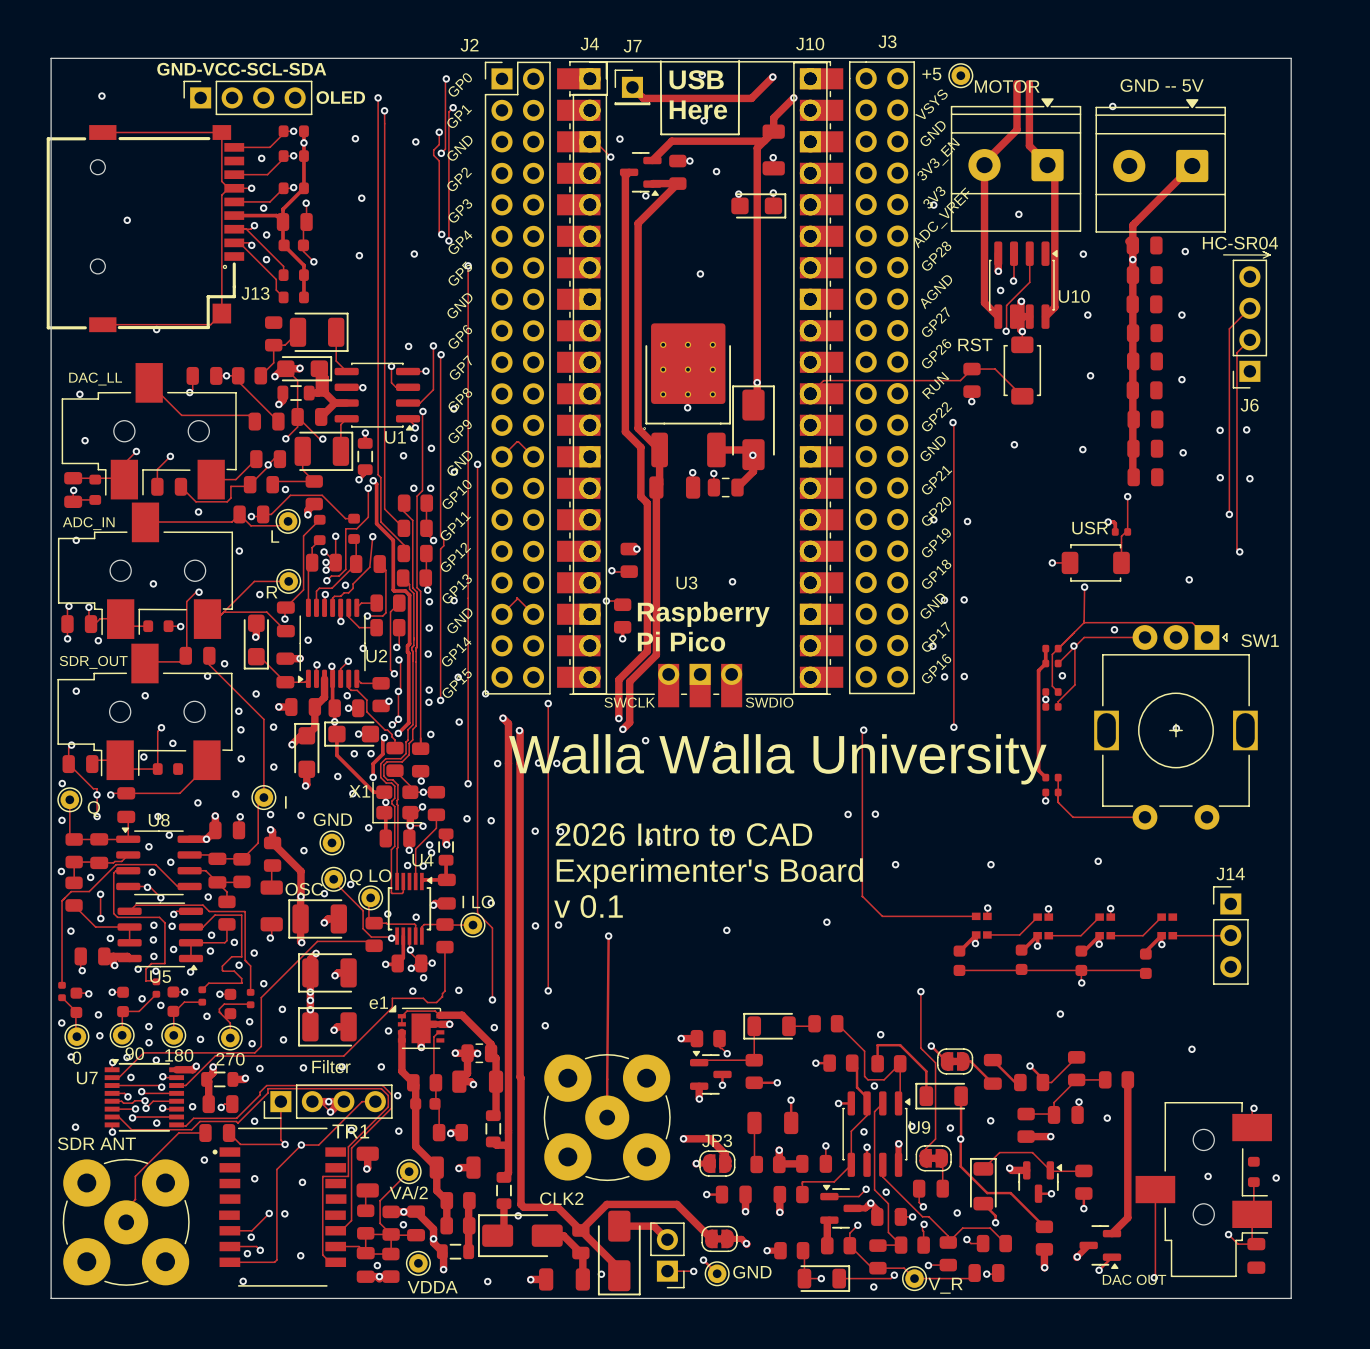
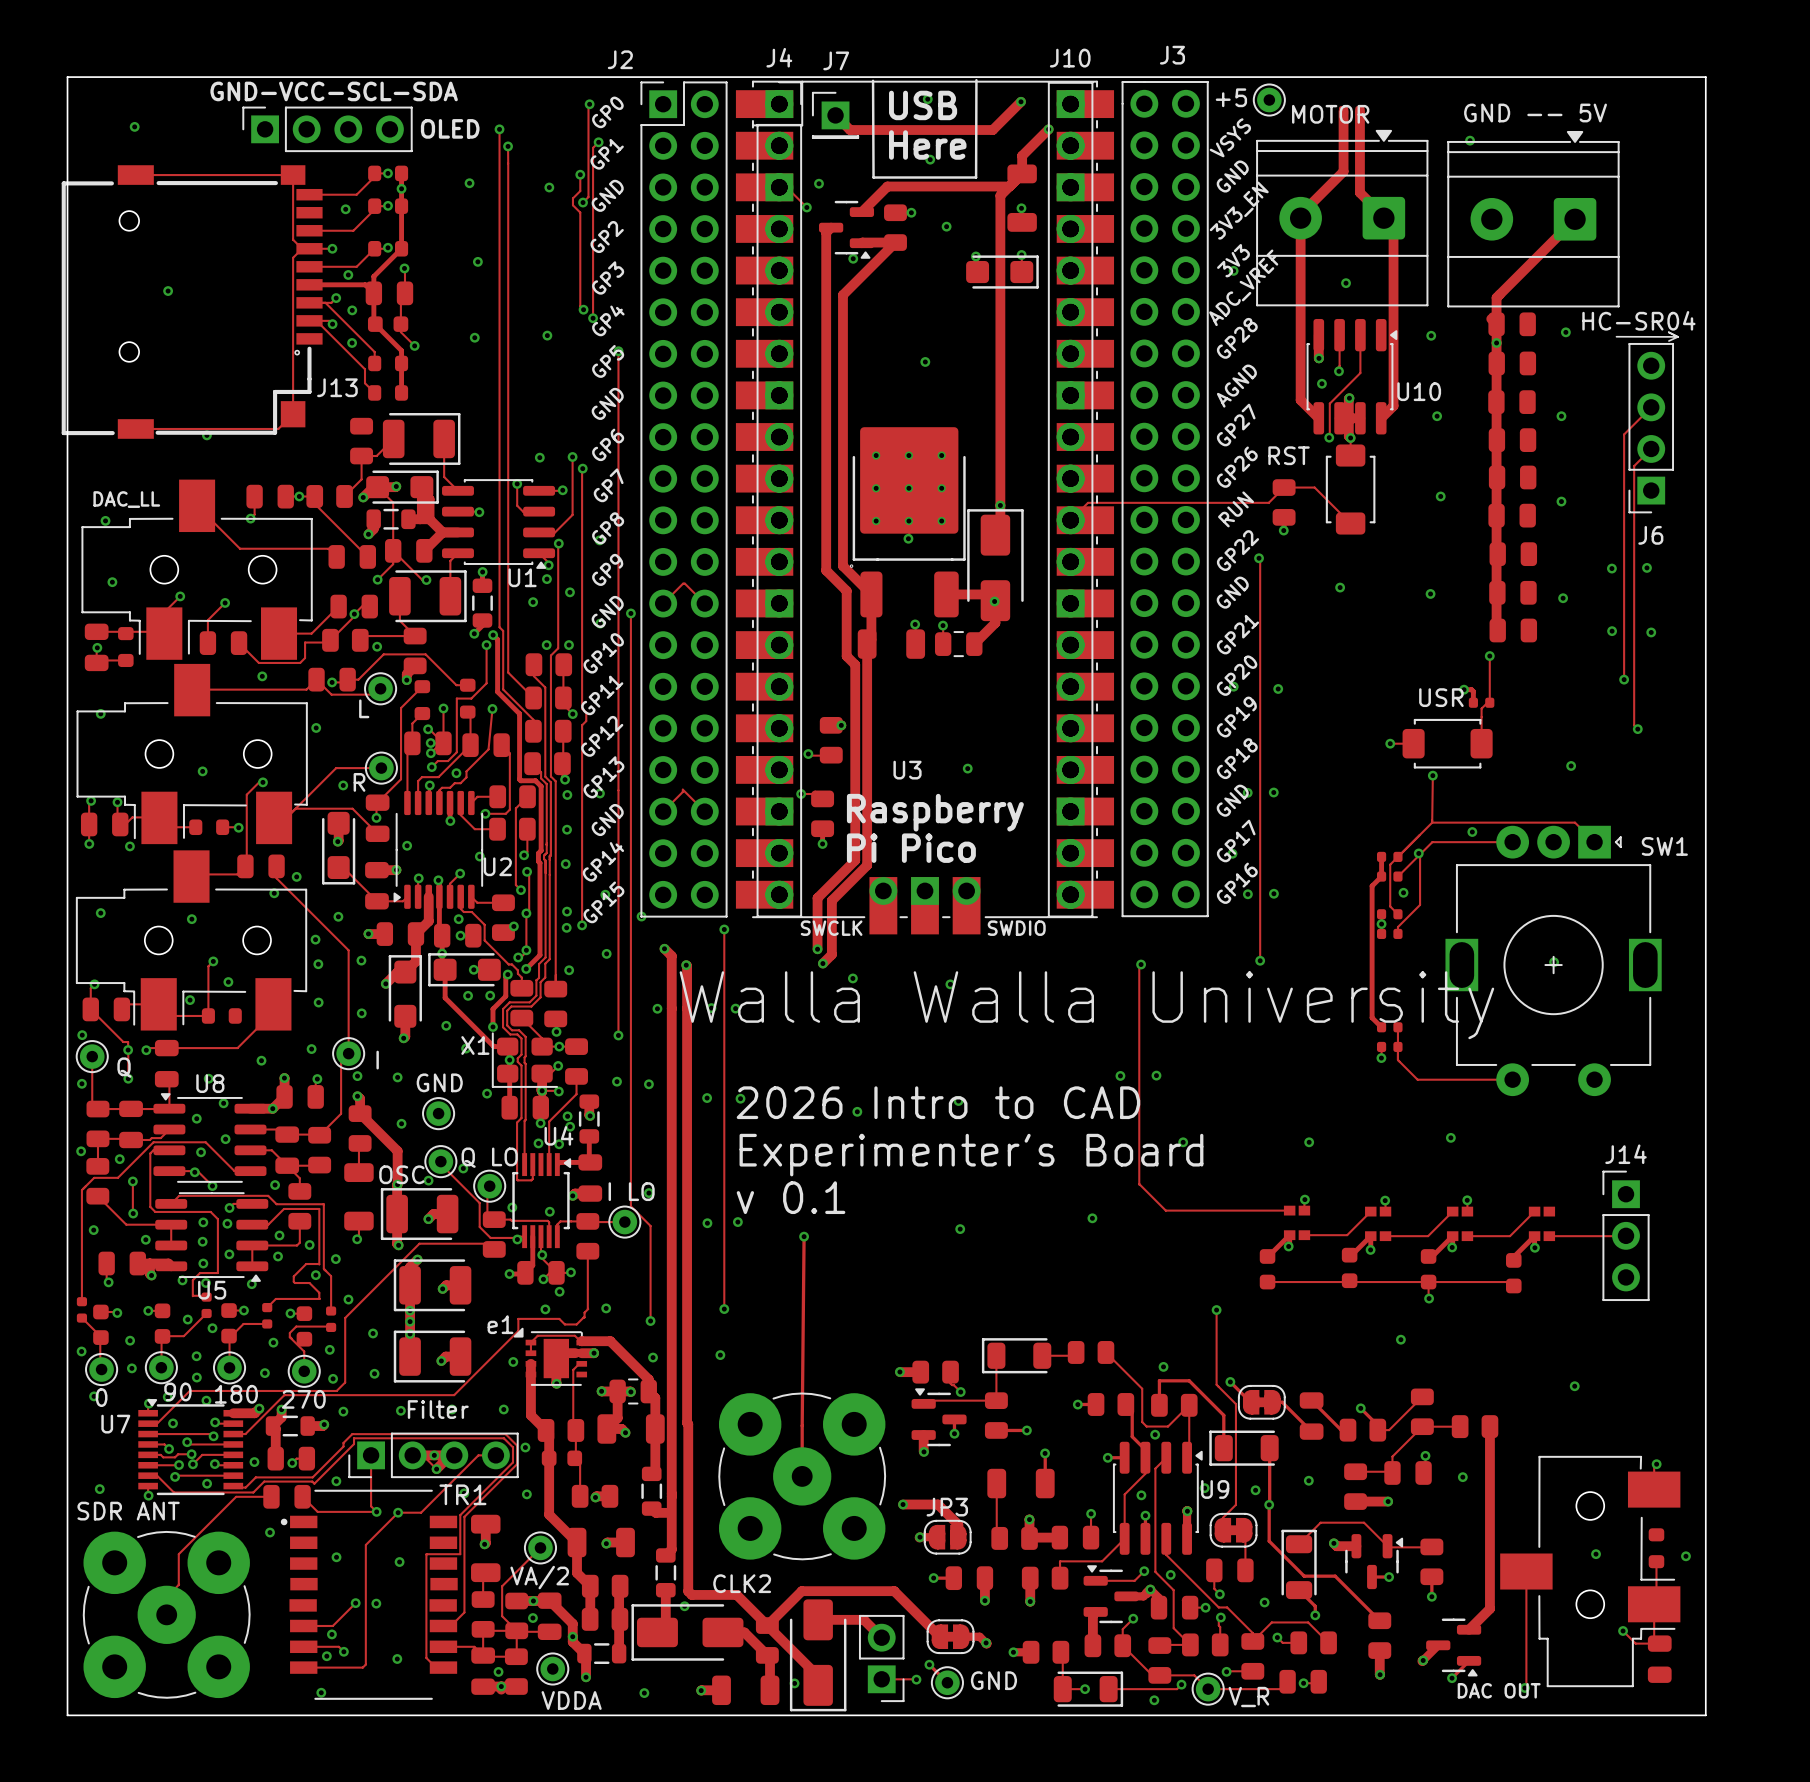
part text: ADC_IN (88, 523) -> none
part text: SDR_OUT (93, 662) -> none

